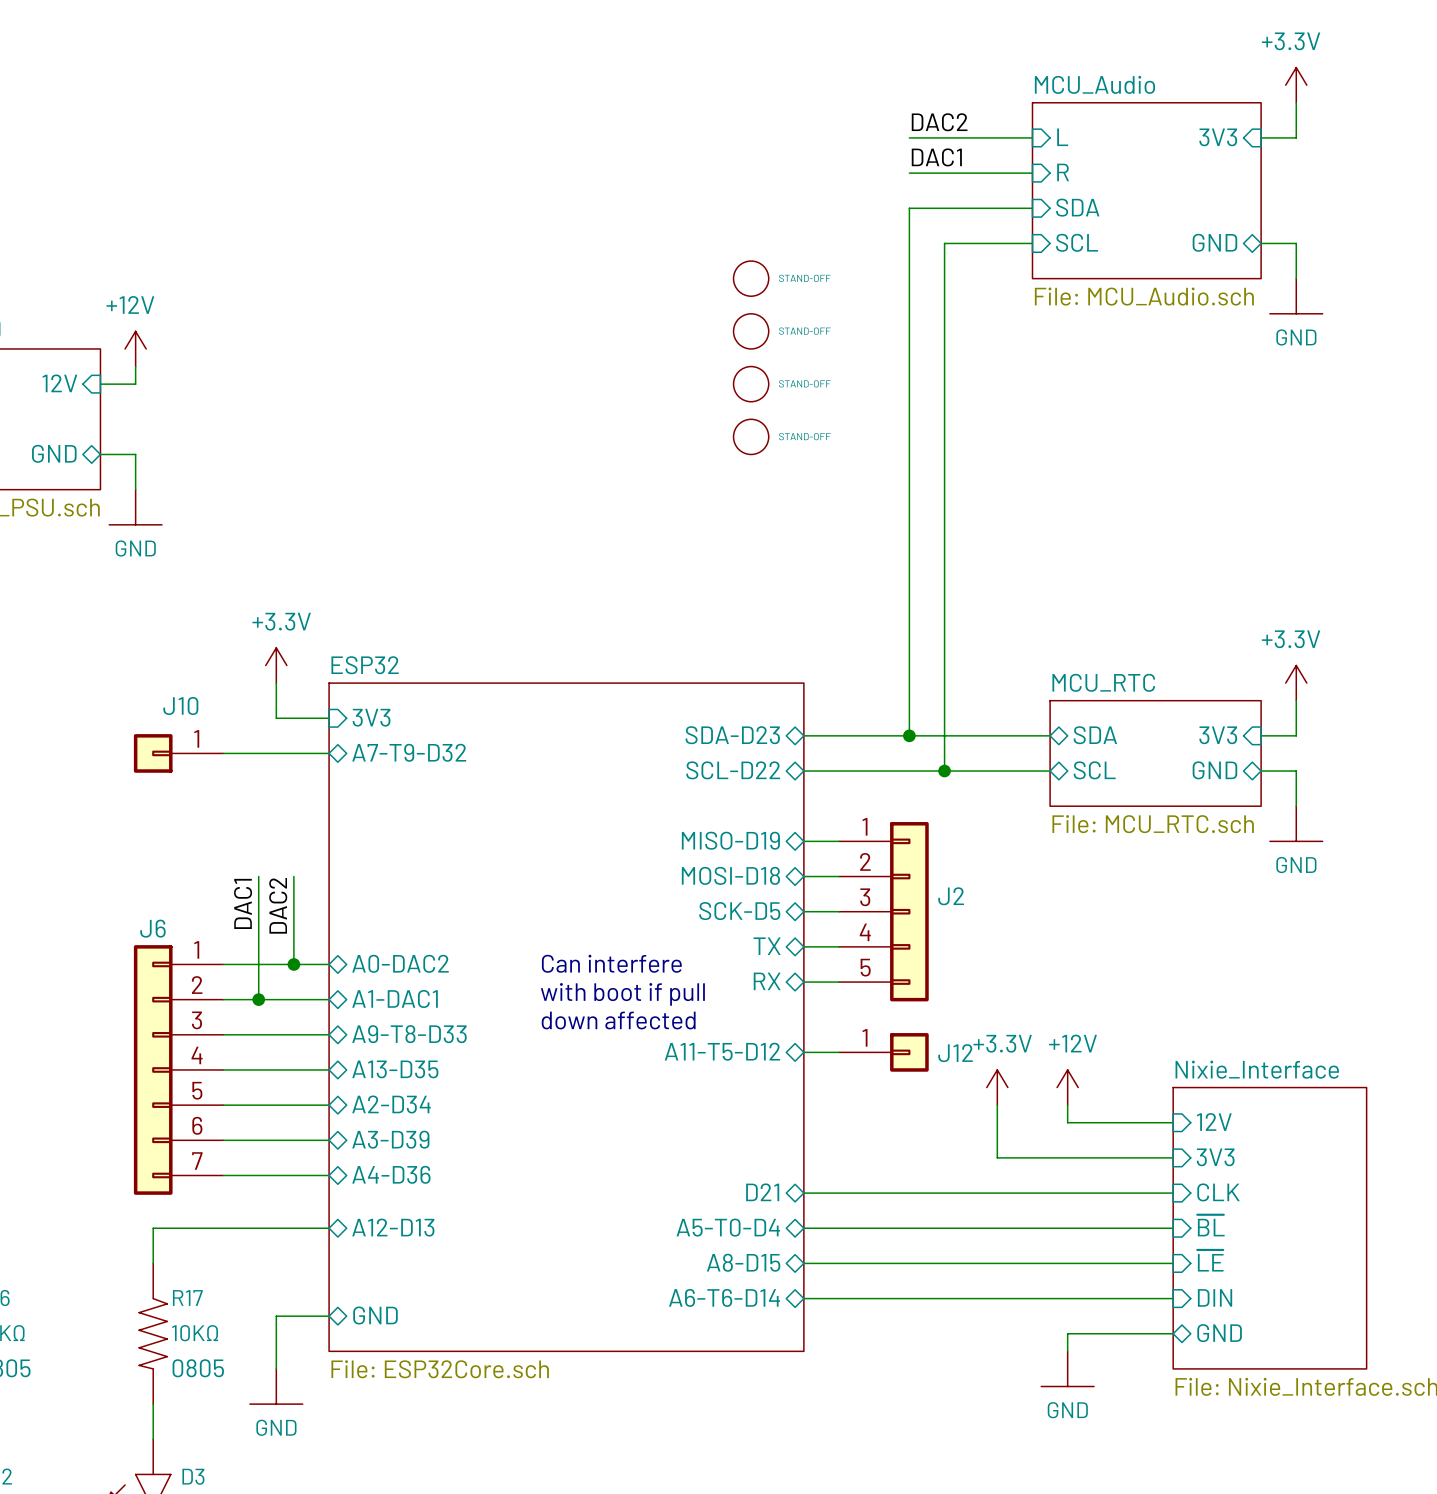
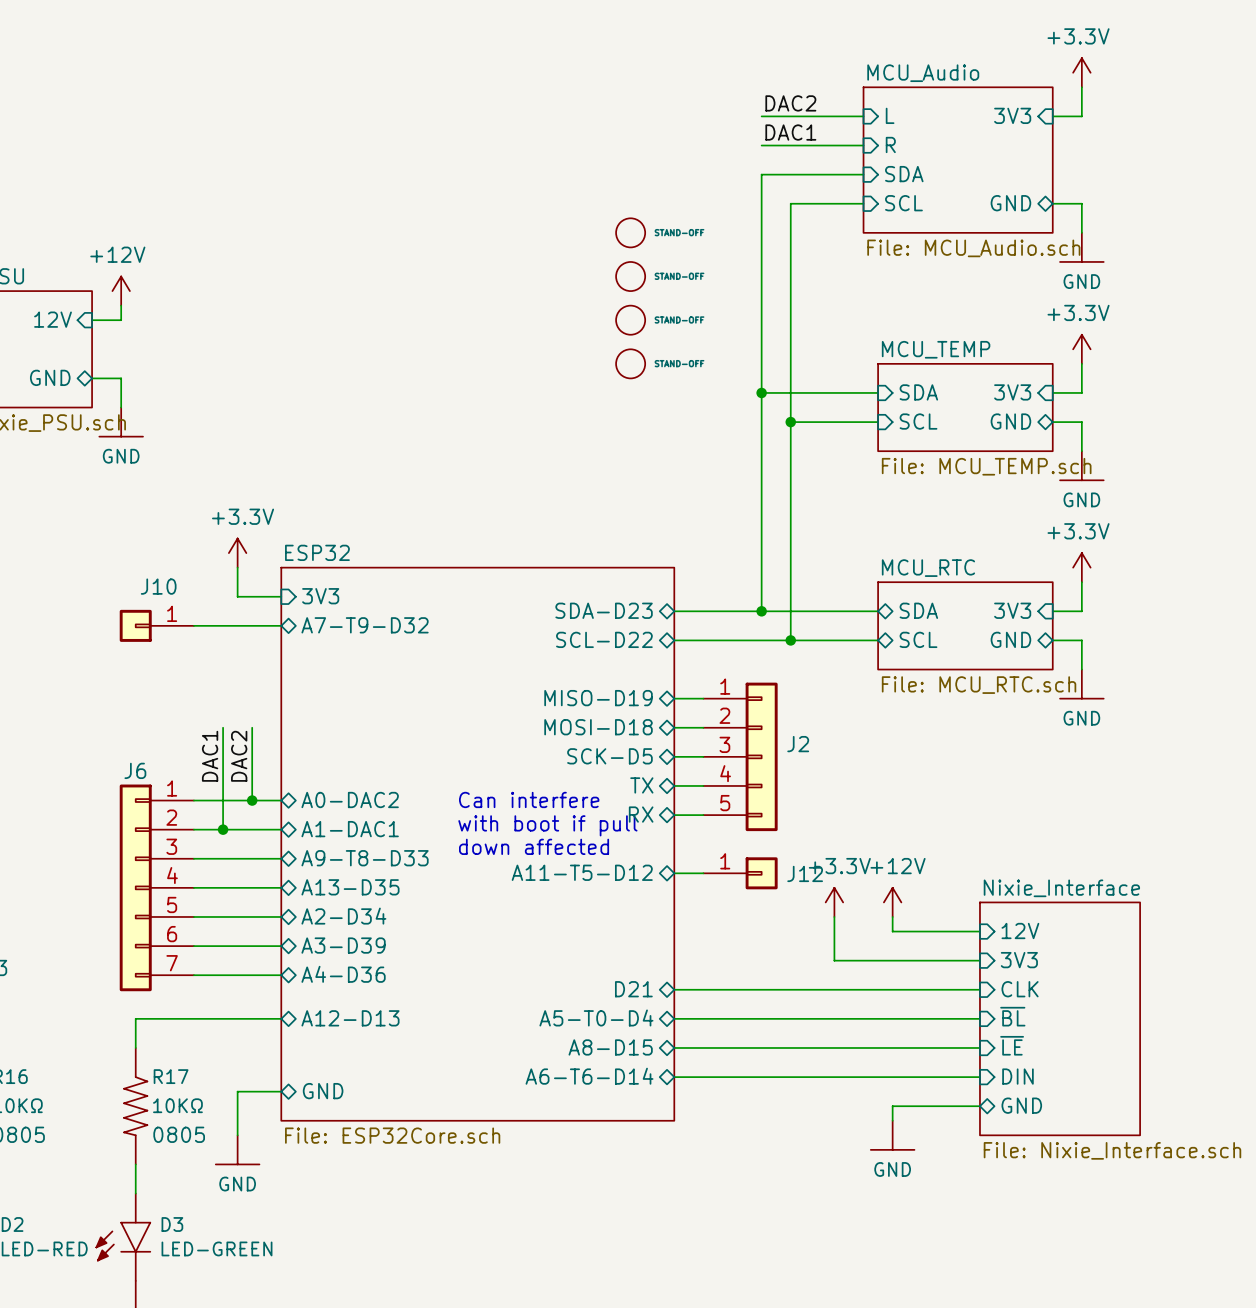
power symbol: none -> +3.3V (1081, 349)
wire: none -> (1081, 363) (1081, 392) (1052, 392)
sheet pin: none -> SDA (918, 392)
sheet pin: none -> 3V3 (1012, 392)
wire: none -> (761, 392) (878, 392)
junction: none -> (761, 392)
sheet MCU_TEMP: none -> File: MCU_TEMP.sch (965, 407)
sheet pin: none -> SCL (918, 421)
sheet pin: none -> GND (1010, 421)
wire: none -> (790, 422) (878, 422)
junction: none -> (790, 422)
wire: none -> (1052, 422) (1081, 422) (1081, 451)
power symbol: none -> GND (1081, 465)

